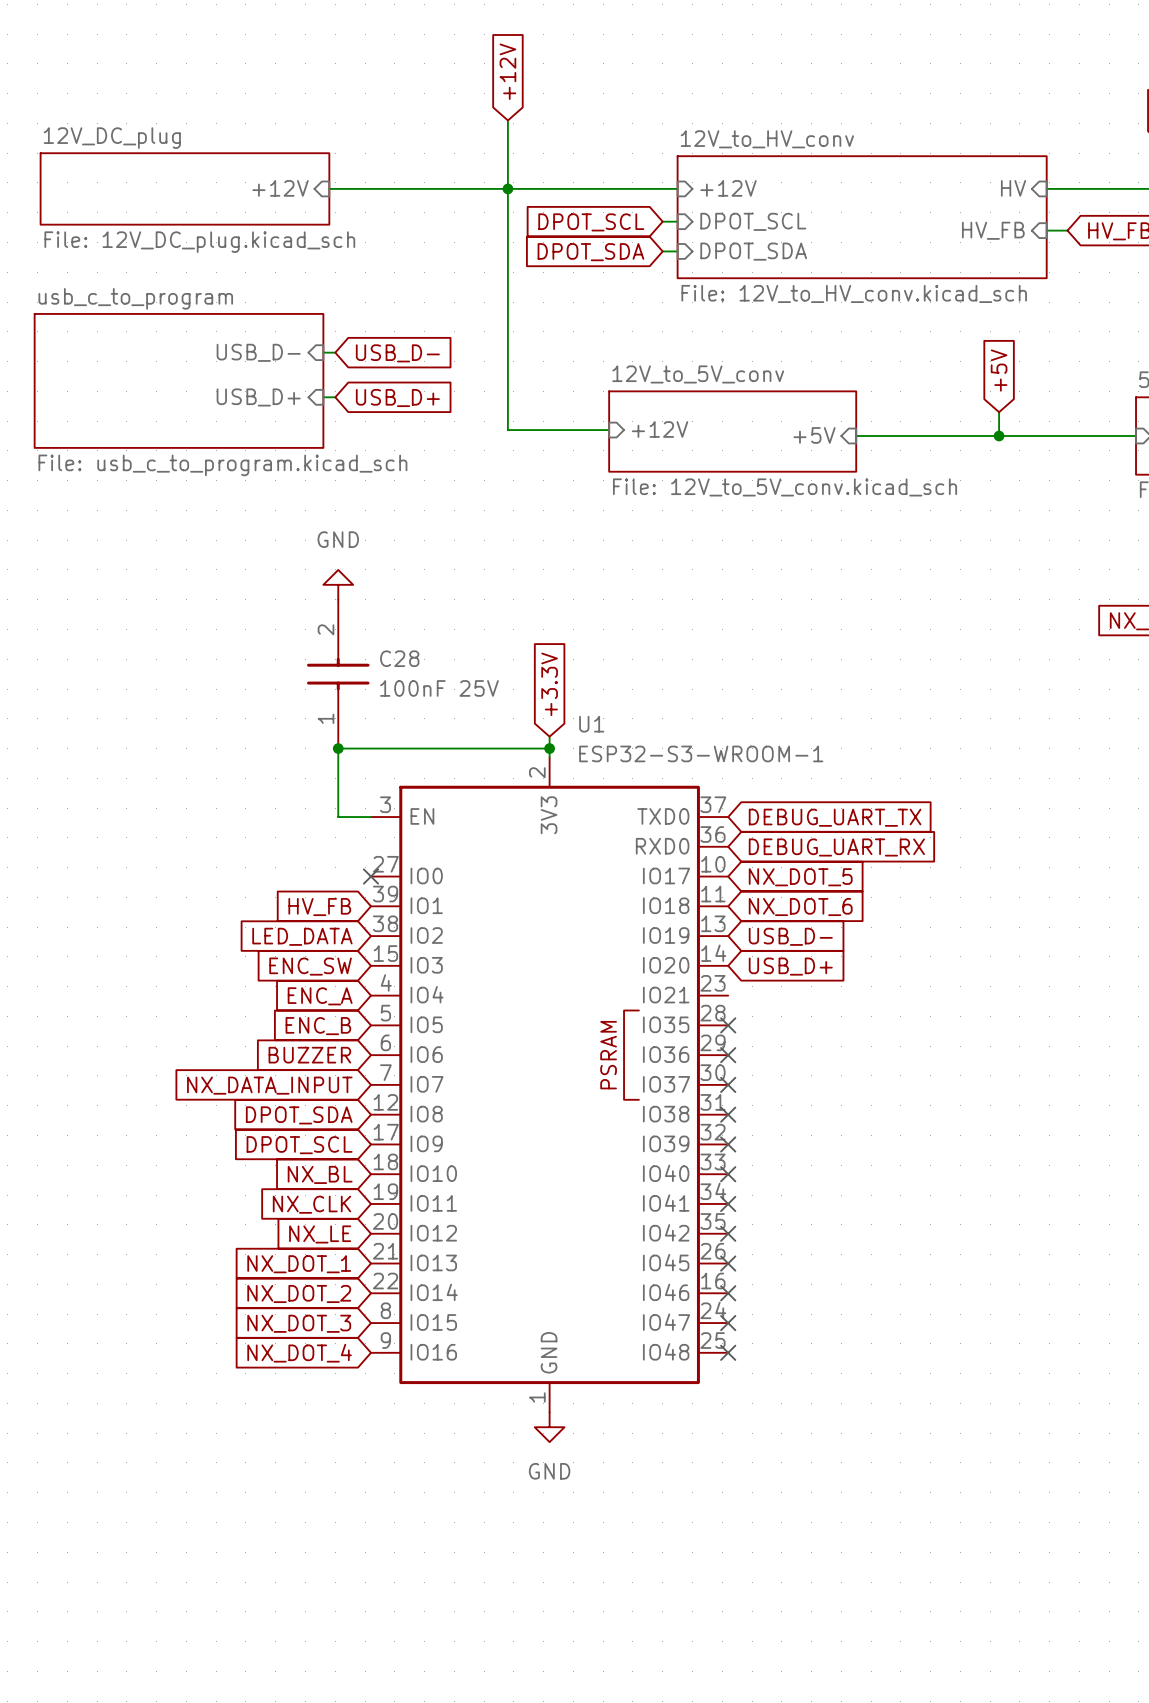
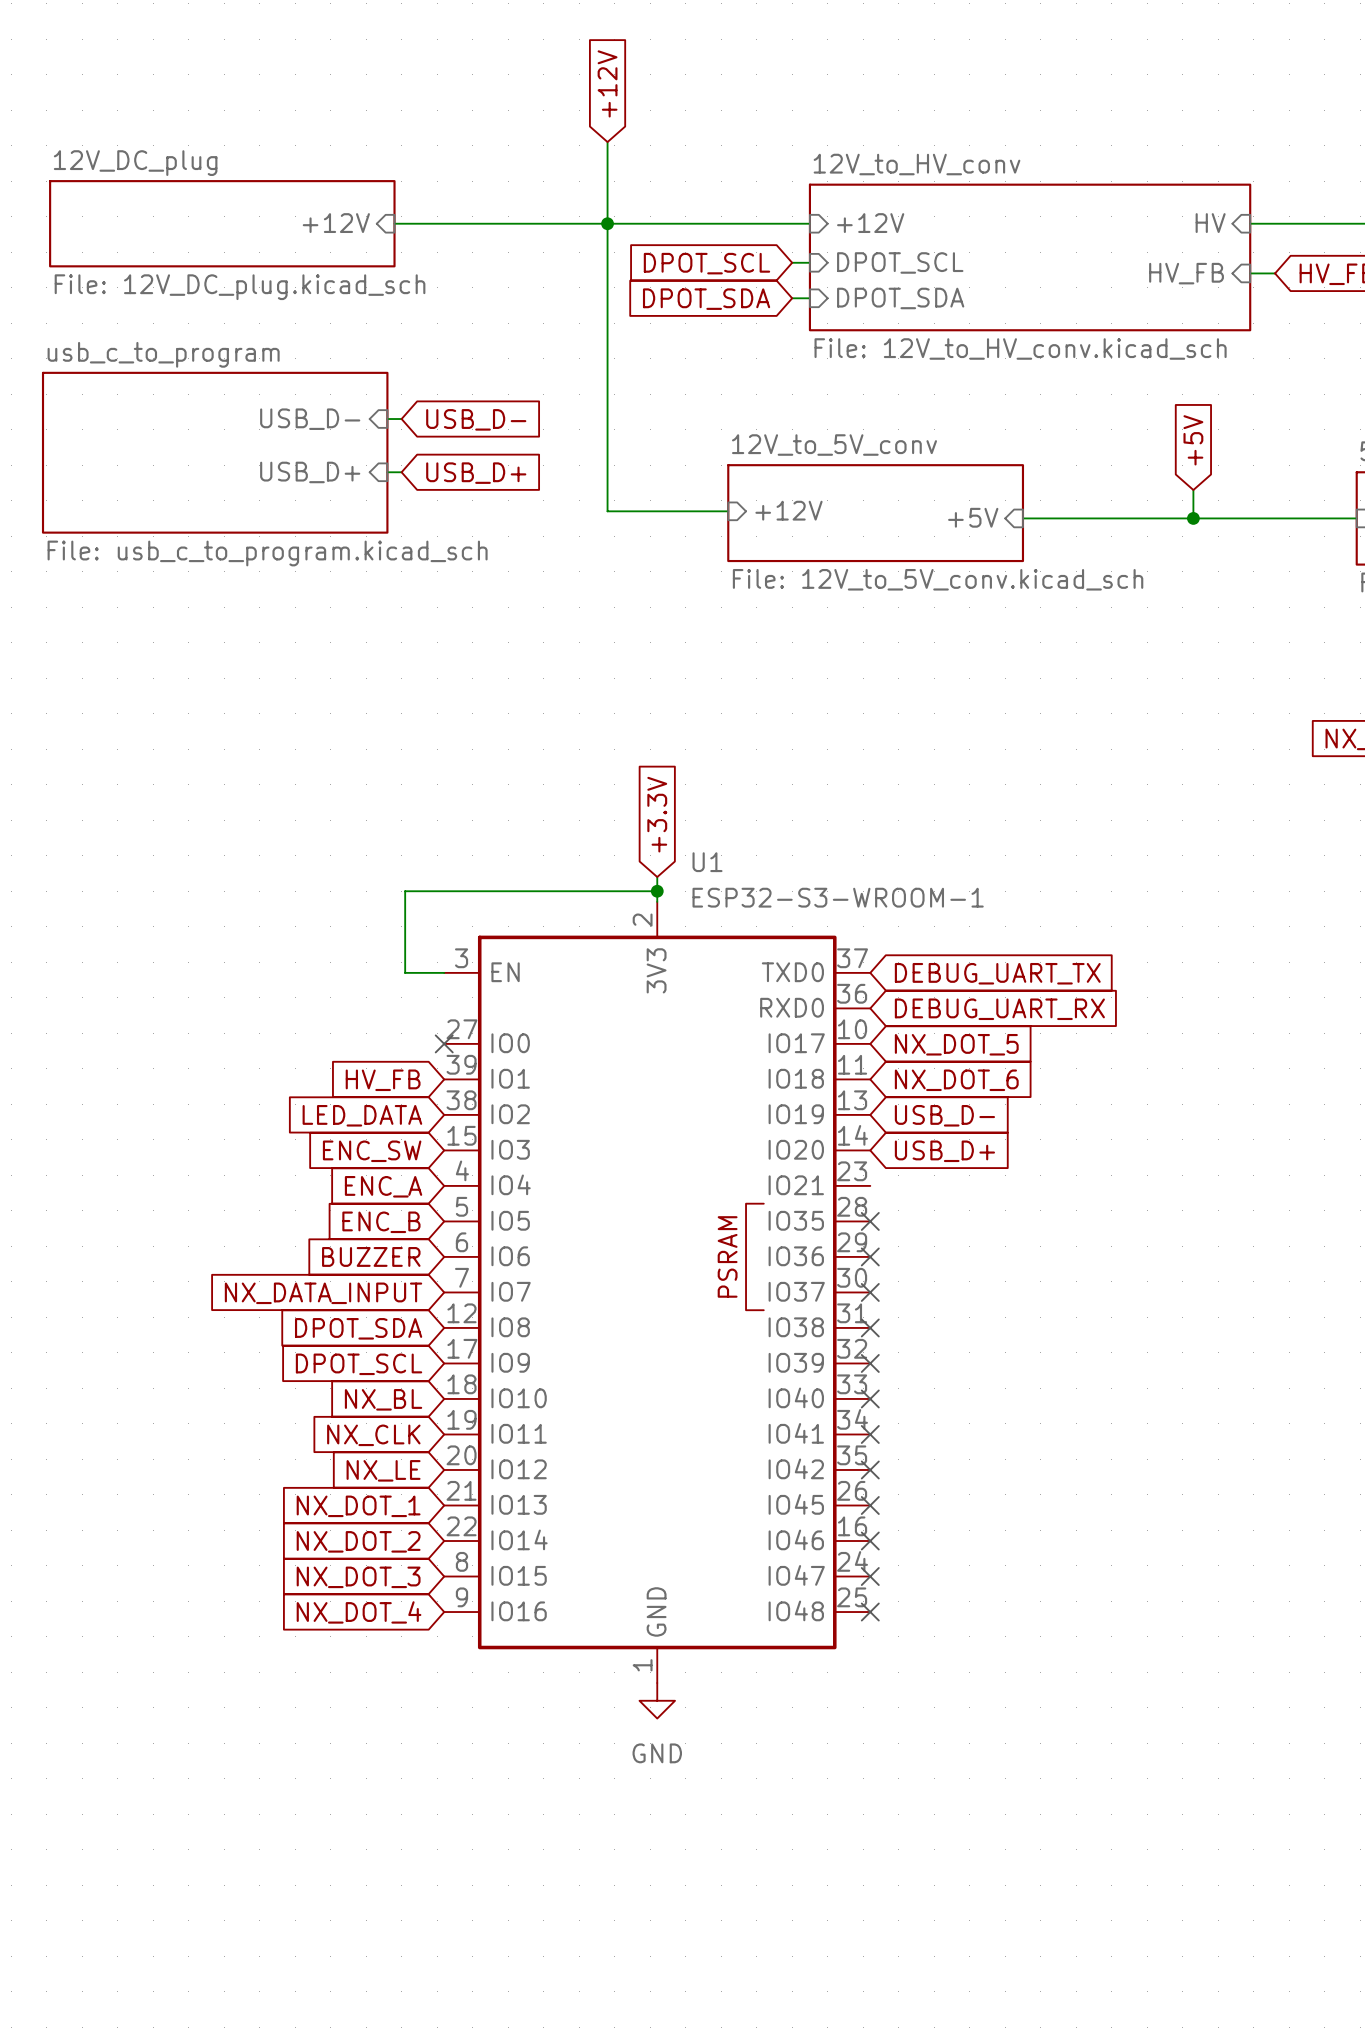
power symbol: GND (338, 584) -> none
C28: 100nF 25V (338, 674) -> none
junction: (338, 748) -> none

